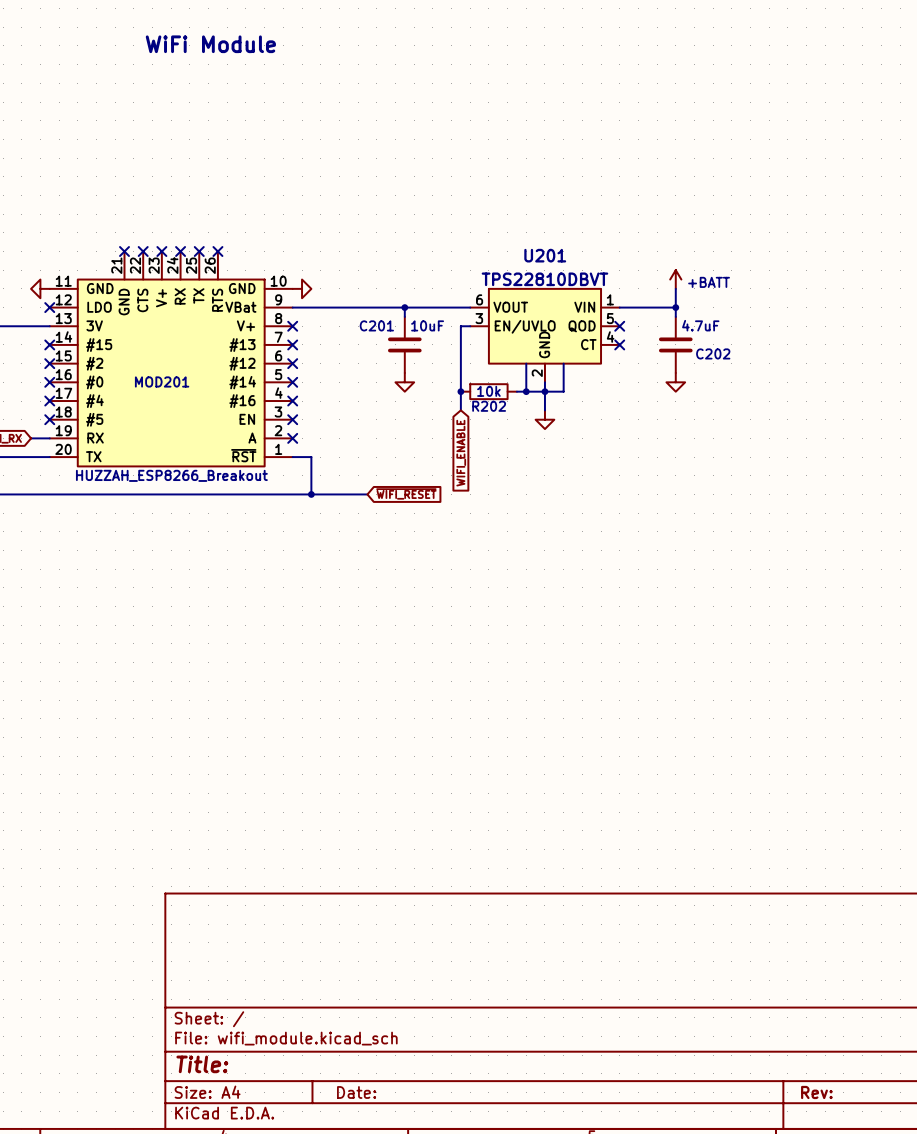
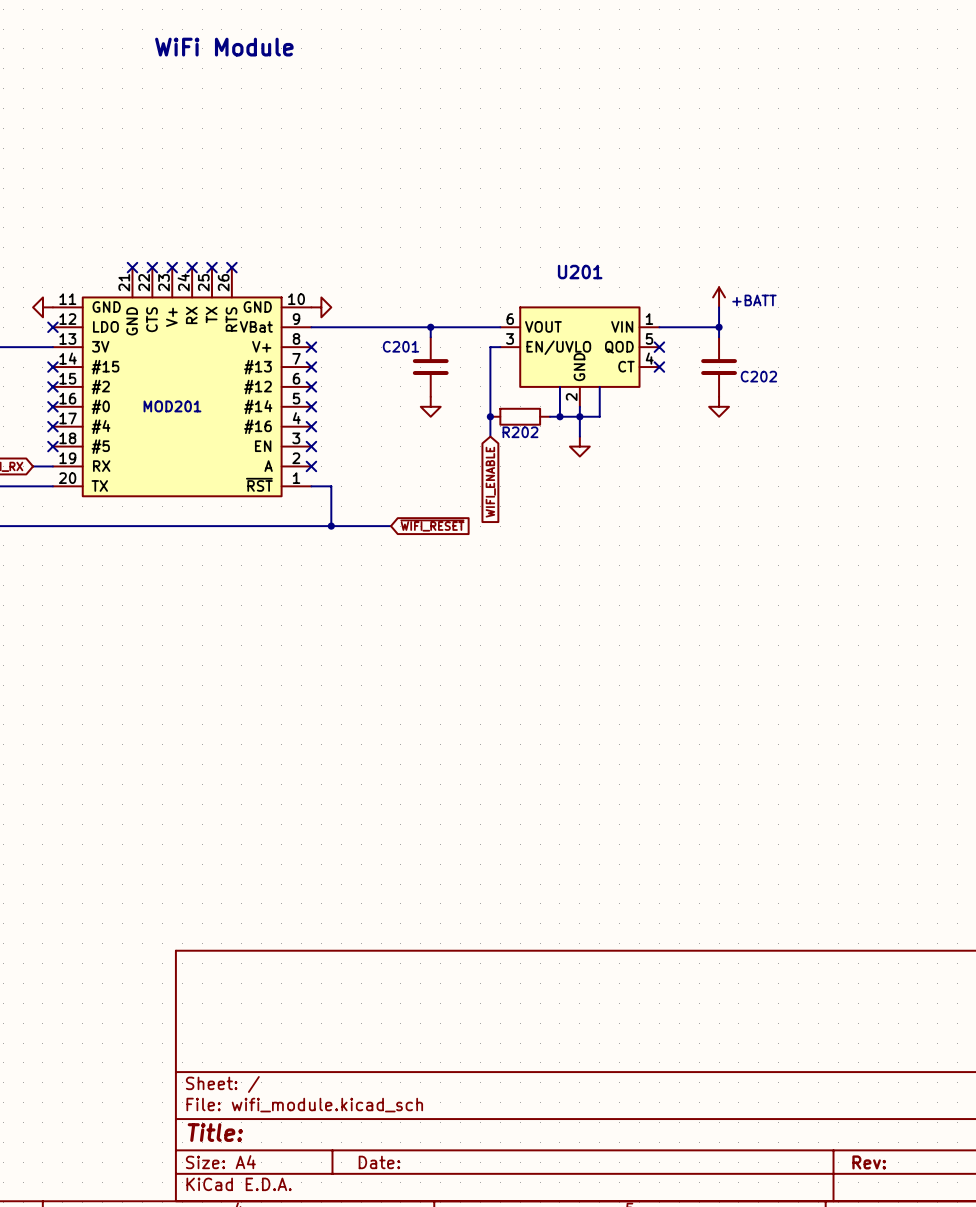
U201 value: TPS22810DBVT (544, 279) -> none
C201 value: 10uF (427, 325) -> none
C202 value: 4.7uF (700, 325) -> none
R202 value: 10k (488, 391) -> none
MOD201 value: HUZZAH_ESP8266_Breakout (171, 475) -> none

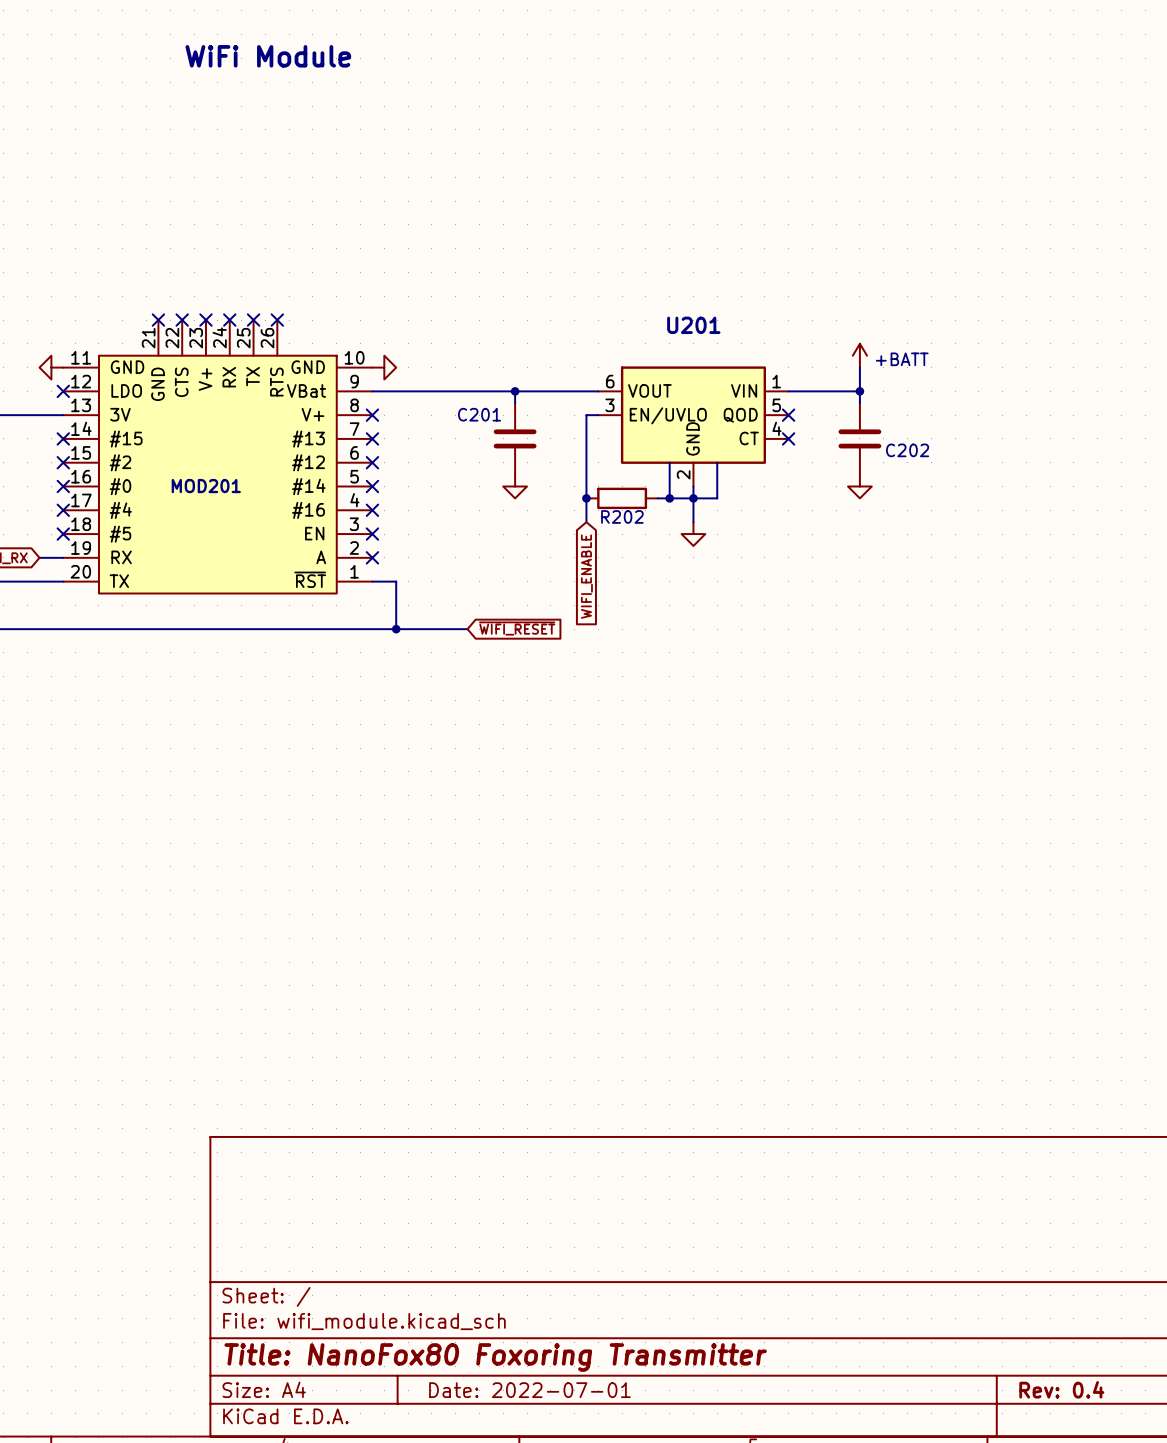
title block: Title: (215, 1132) -> Title: NanoFox80 Foxoring Transmitter (495, 1357)
title block: Date: (379, 1162) -> Date: 2022-07-01 (529, 1390)
title block: Rev: (869, 1162) -> Rev: 0.4 (1061, 1389)

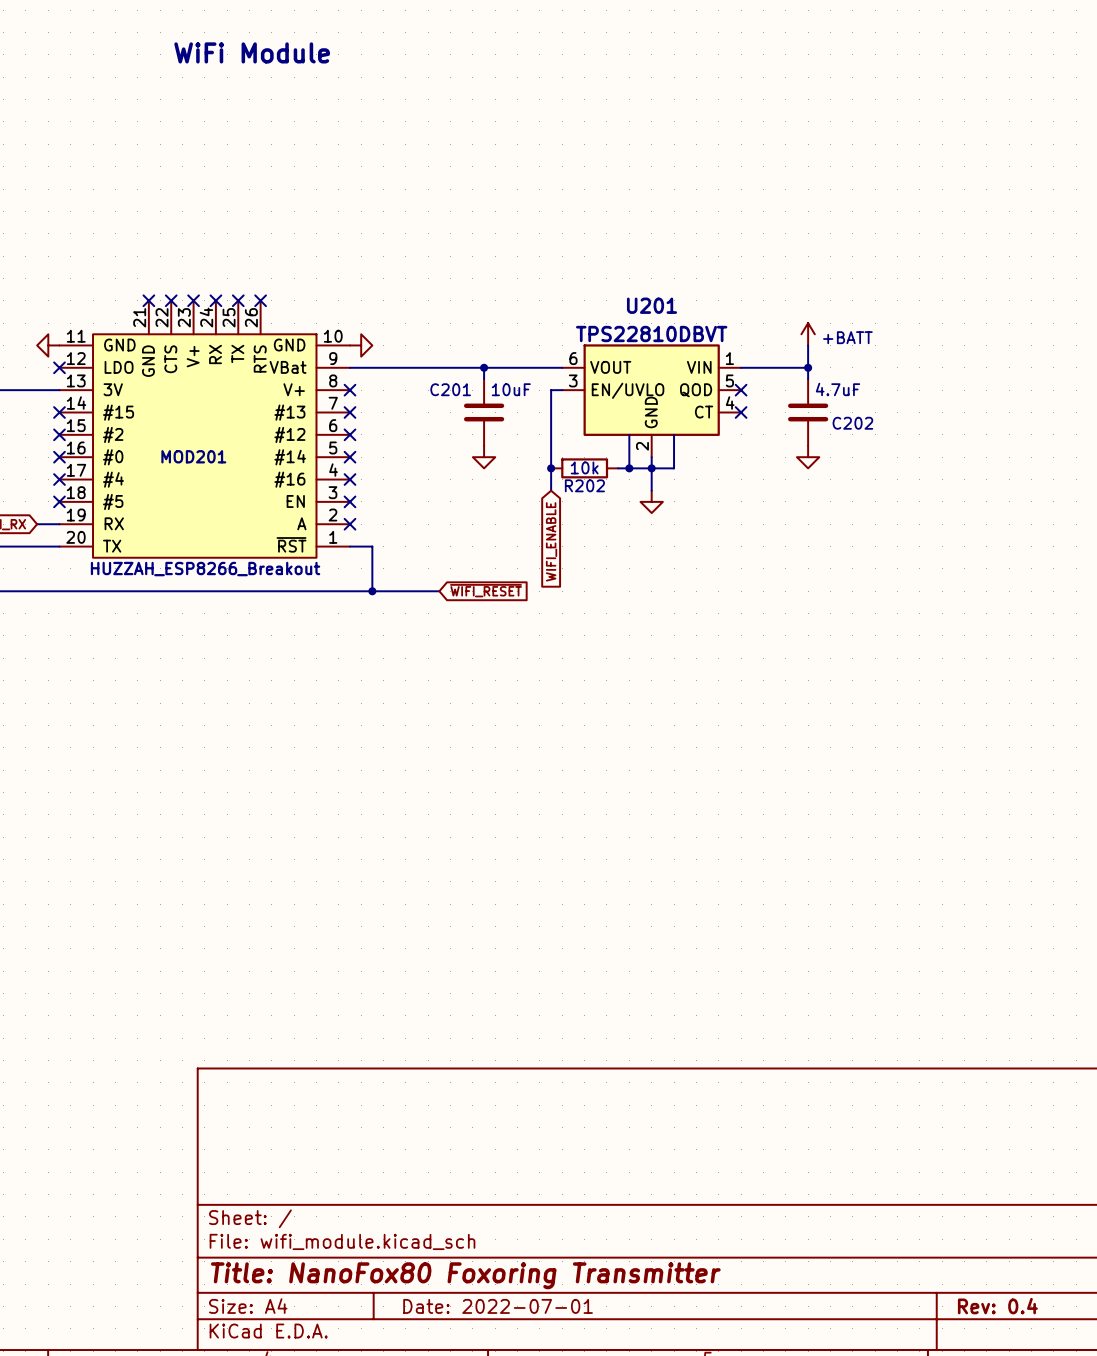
U201 value: none -> TPS22810DBVT (651, 334)
C201 value: none -> 10uF (511, 389)
C202 value: none -> 4.7uF (838, 389)
R202 value: none -> 10k (584, 467)
MOD201 value: none -> HUZZAH_ESP8266_Breakout (205, 569)

